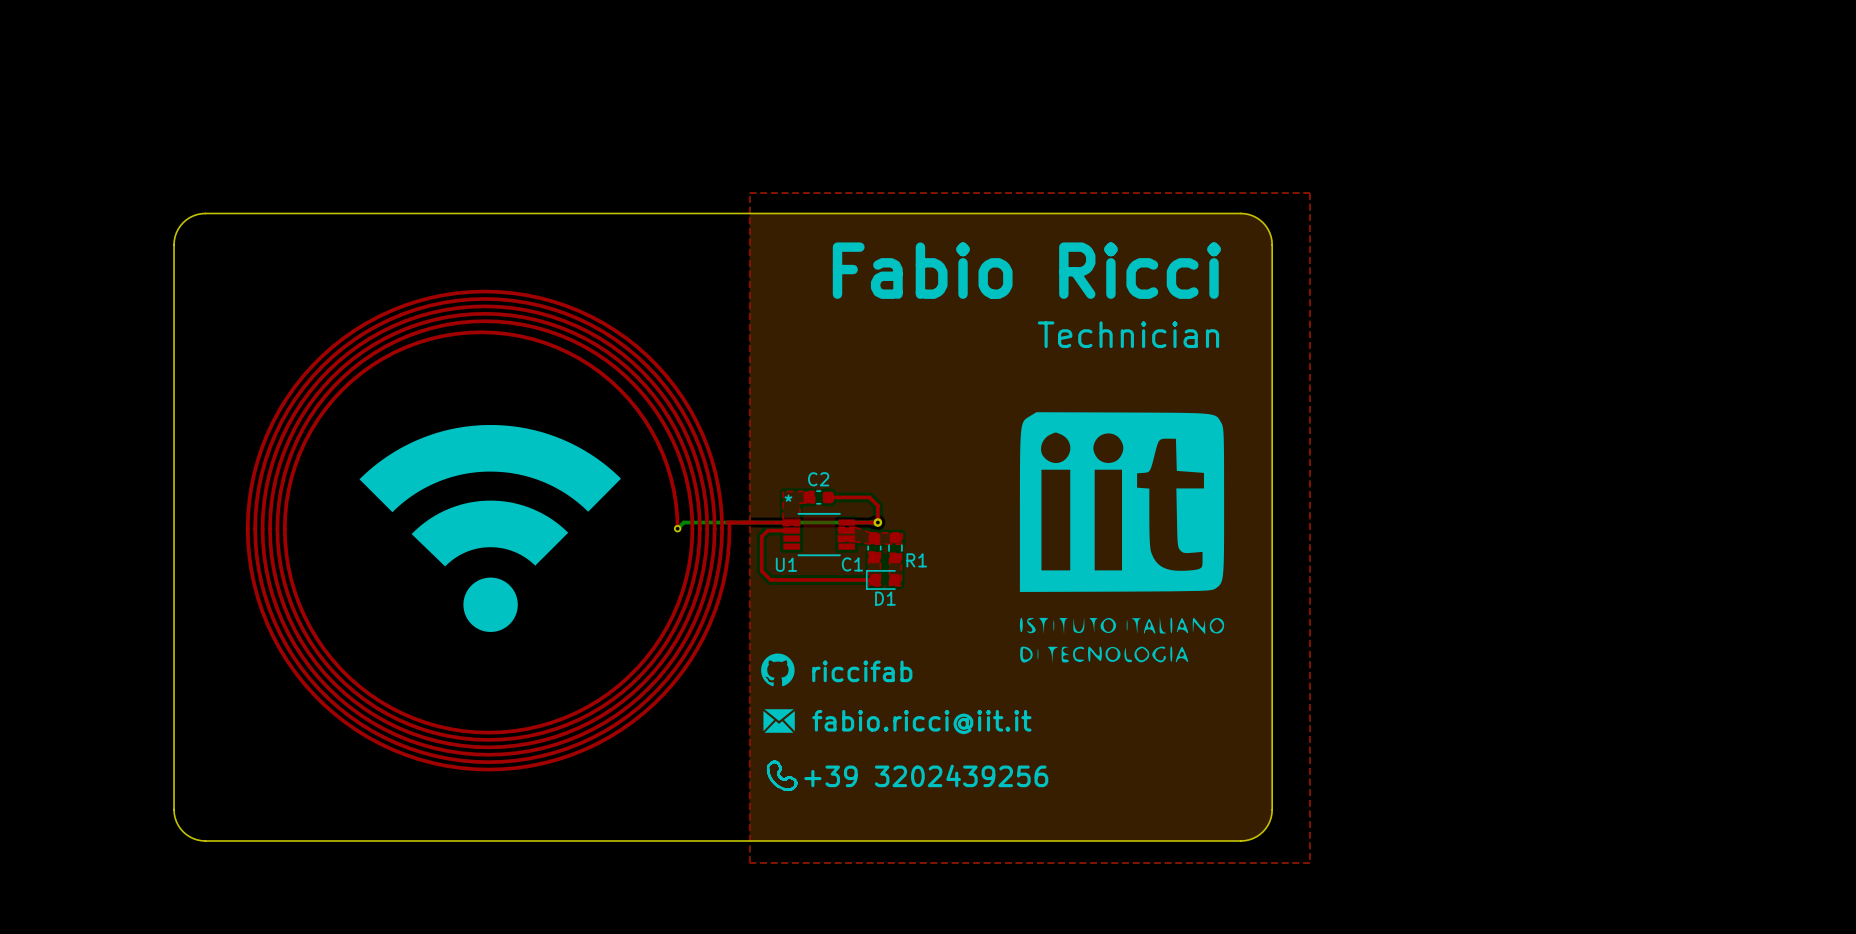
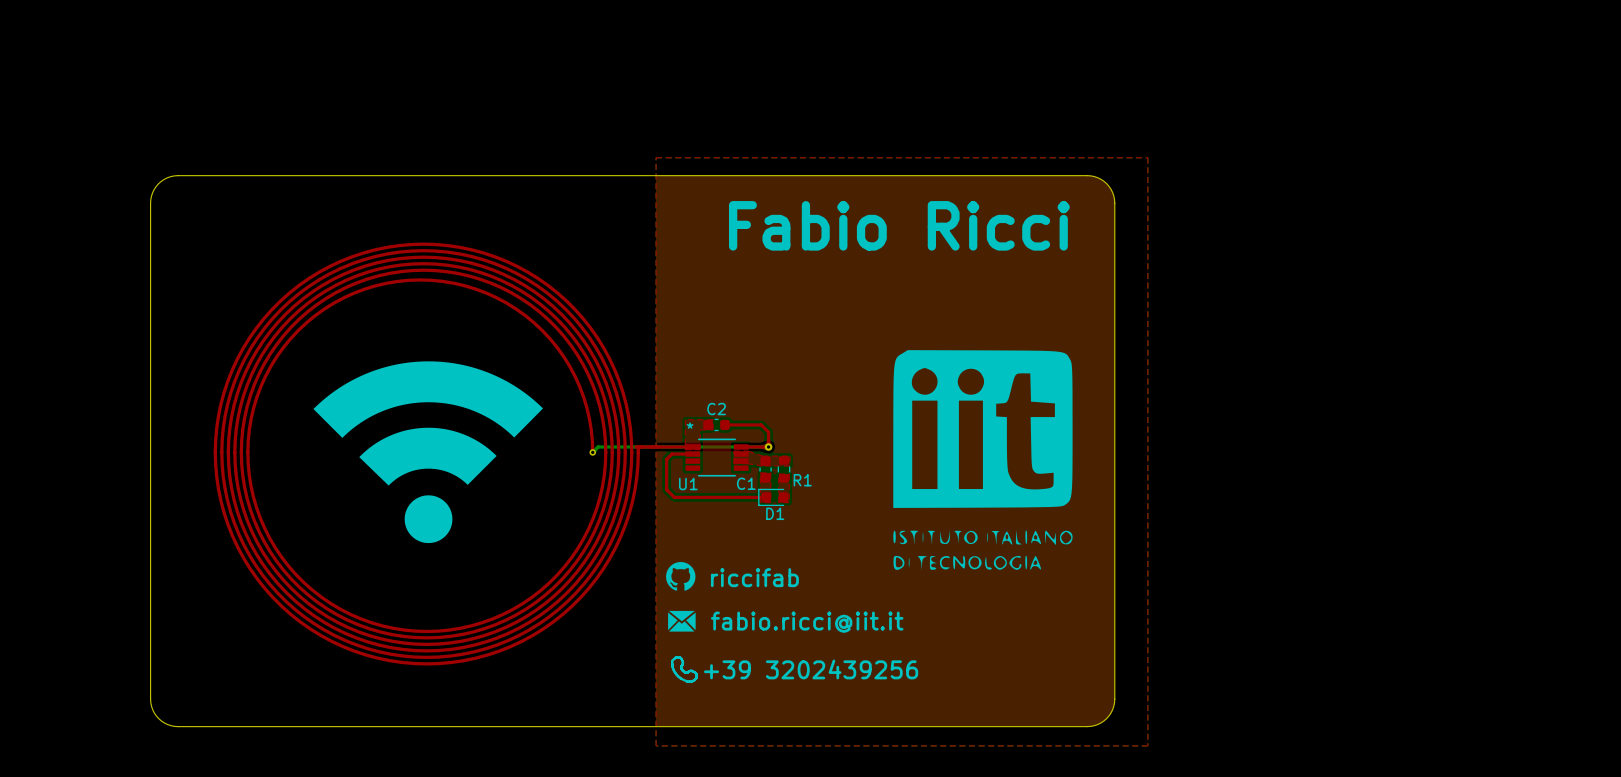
text: Technician (1128, 334) -> none

